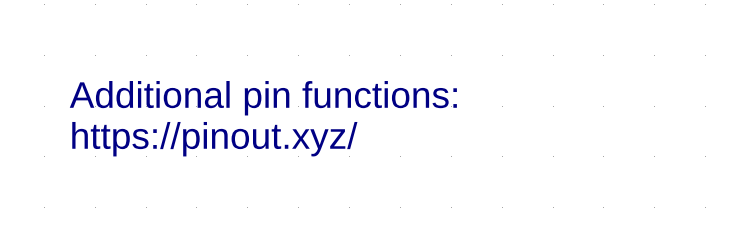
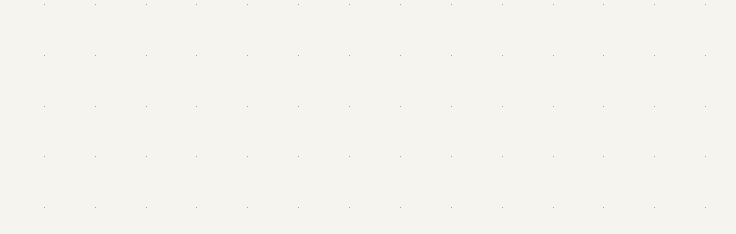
text: Additional pin functions: (263, 98) -> none
text: https://pinout.xyz/ (214, 139) -> none

